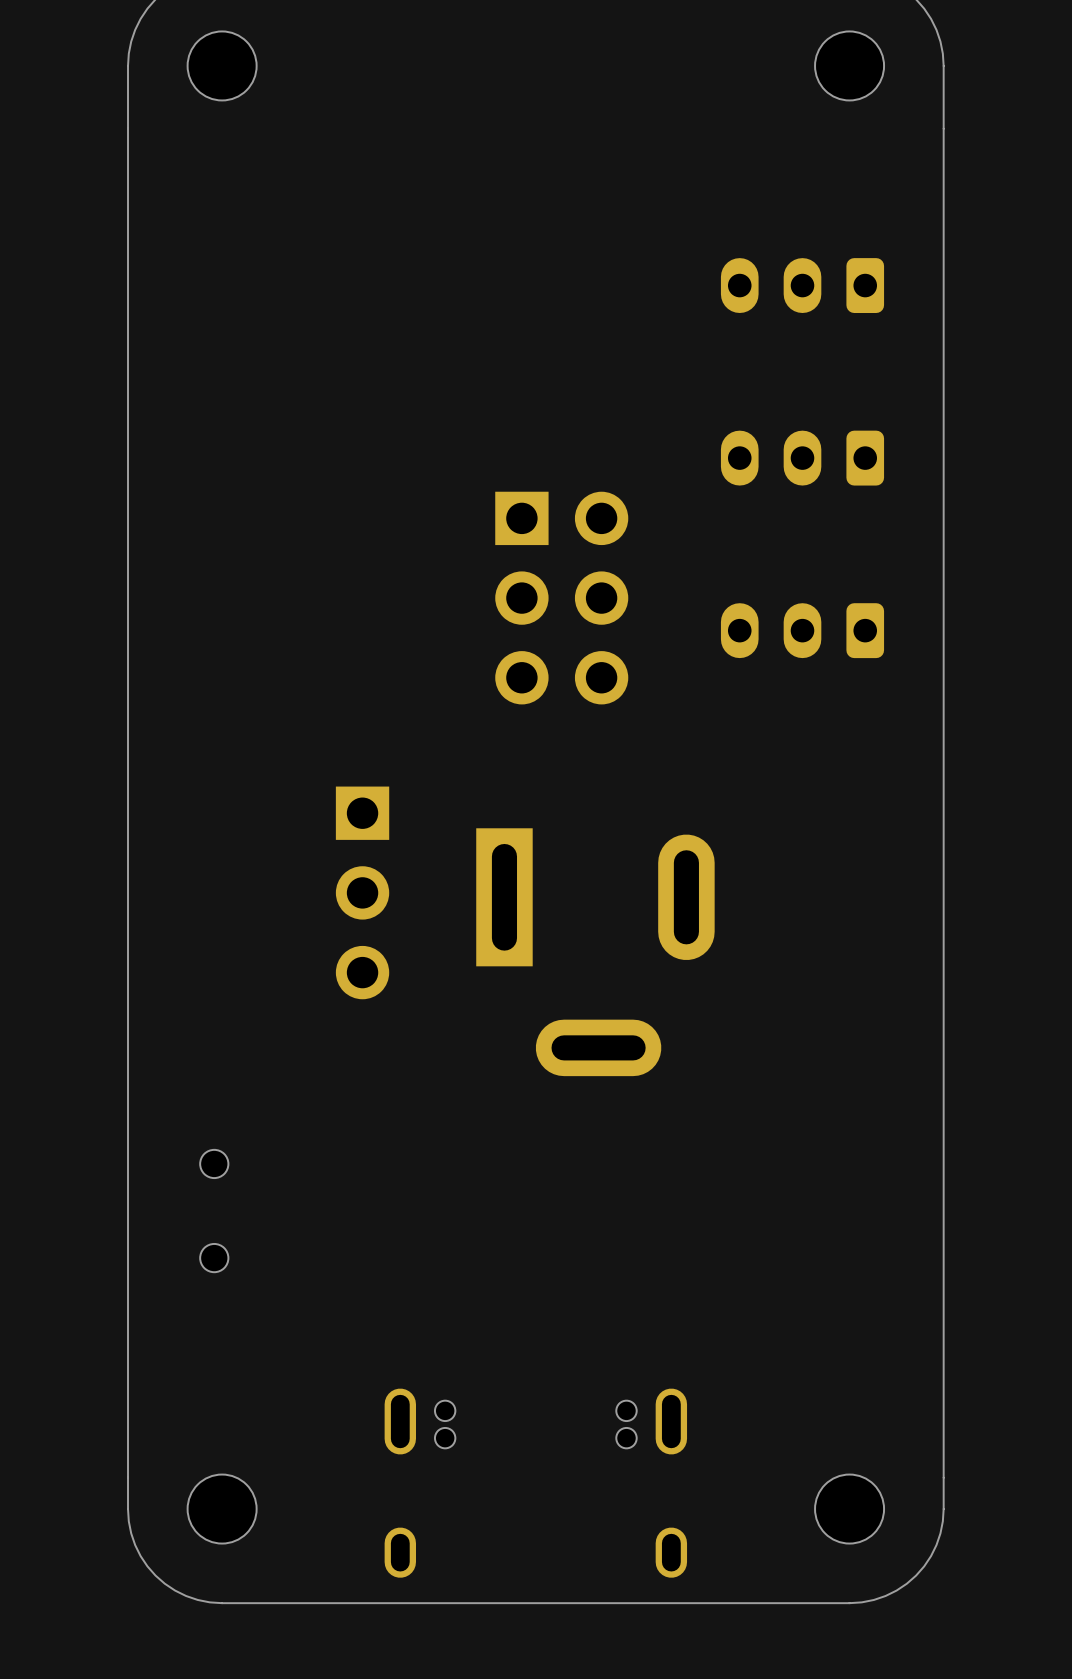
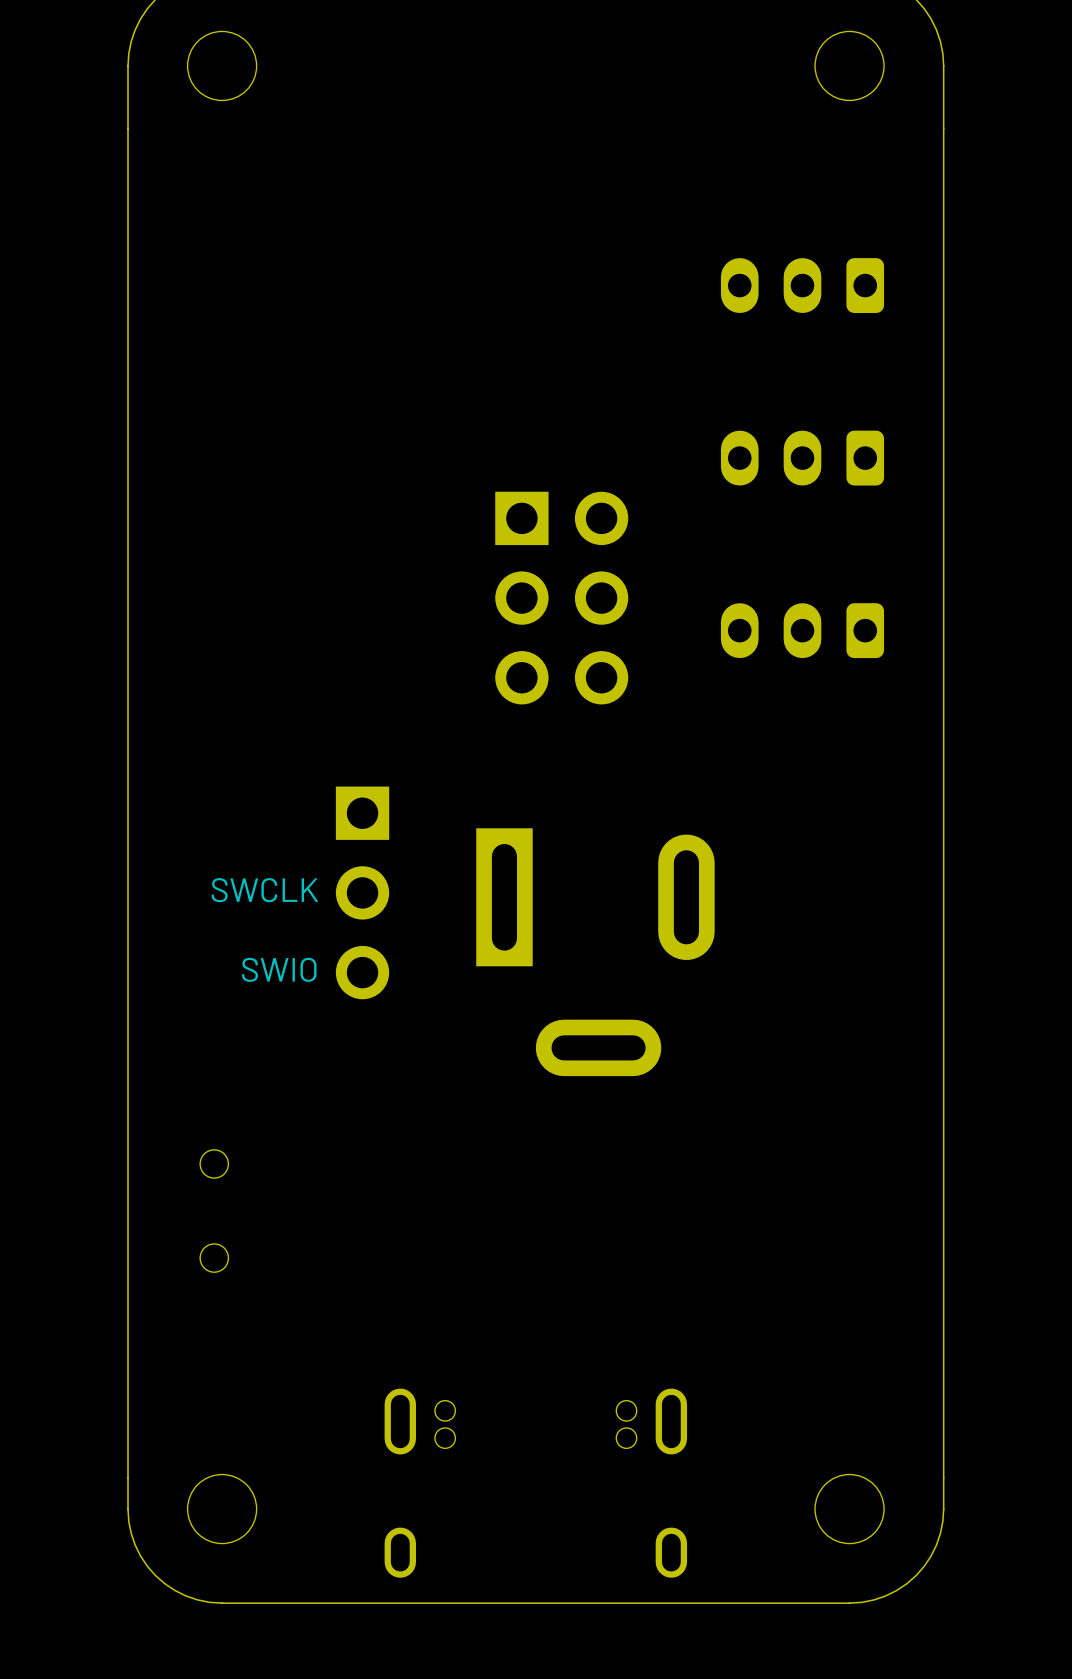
text: none -> SWCLK (264, 890)
text: none -> SWIO (279, 969)

